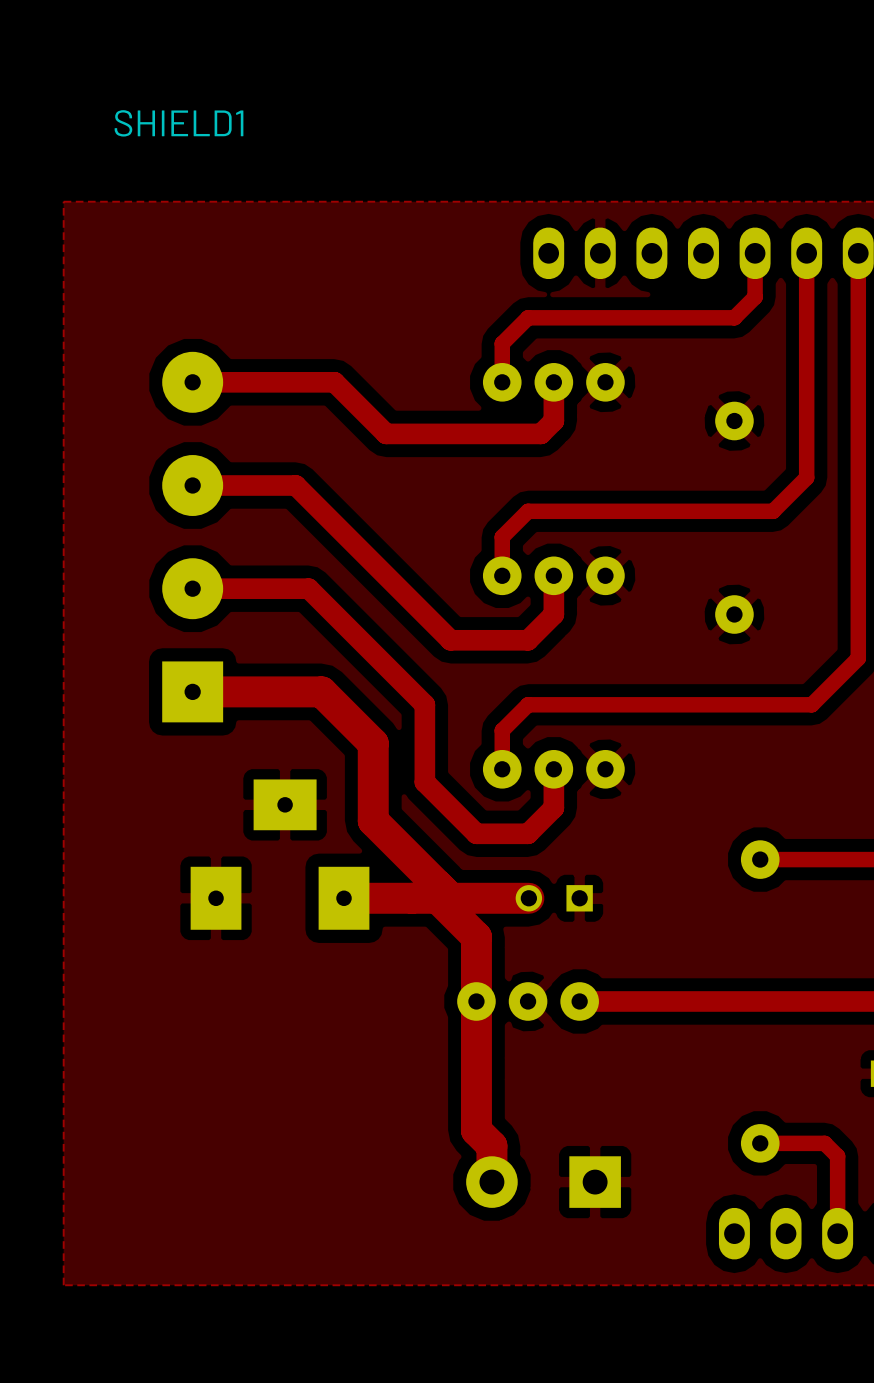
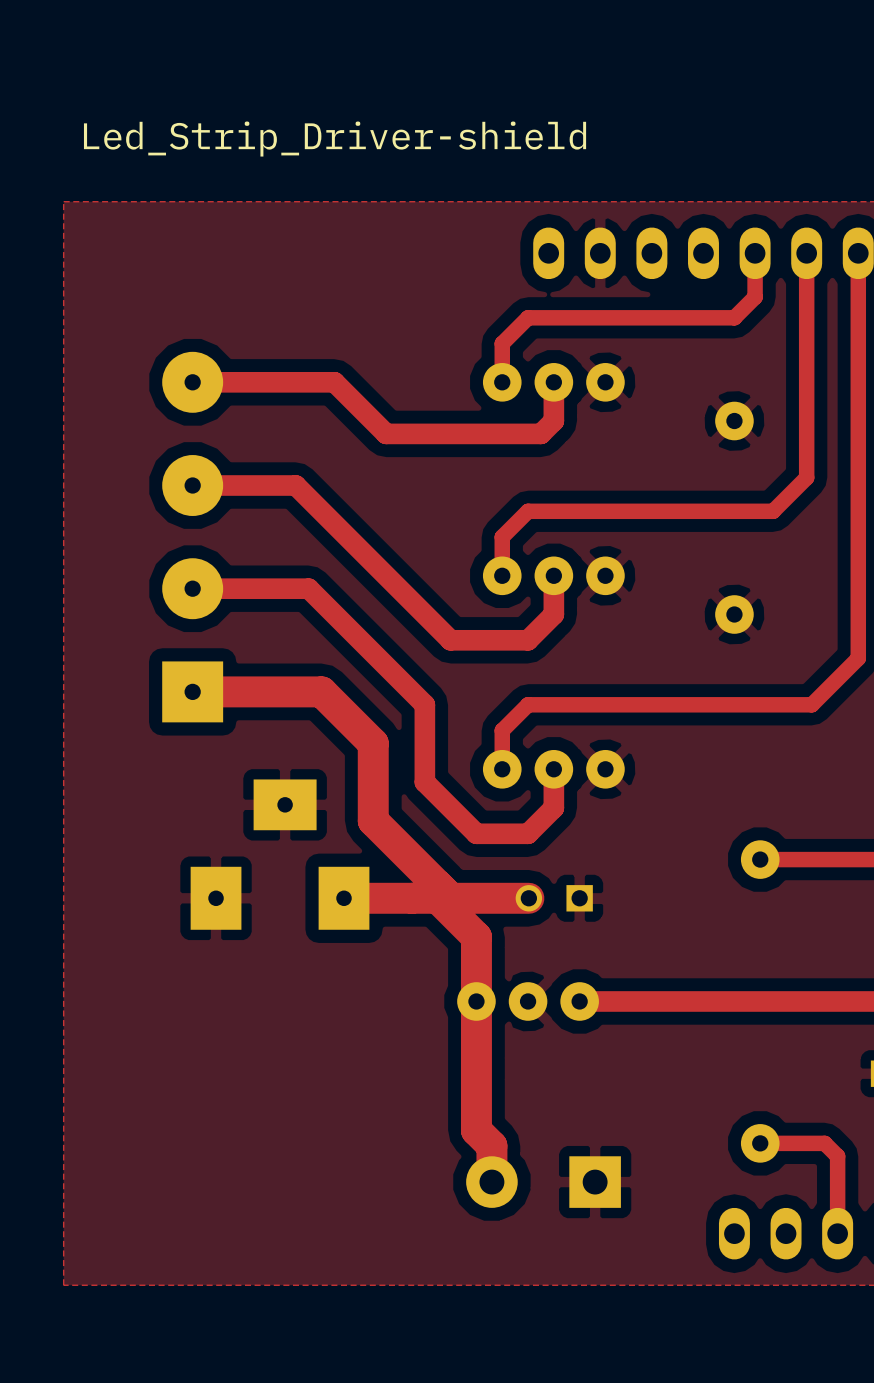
SHIELD1 name: SHIELD1 (179, 123) -> Led_Strip_Driver-shield (335, 139)

